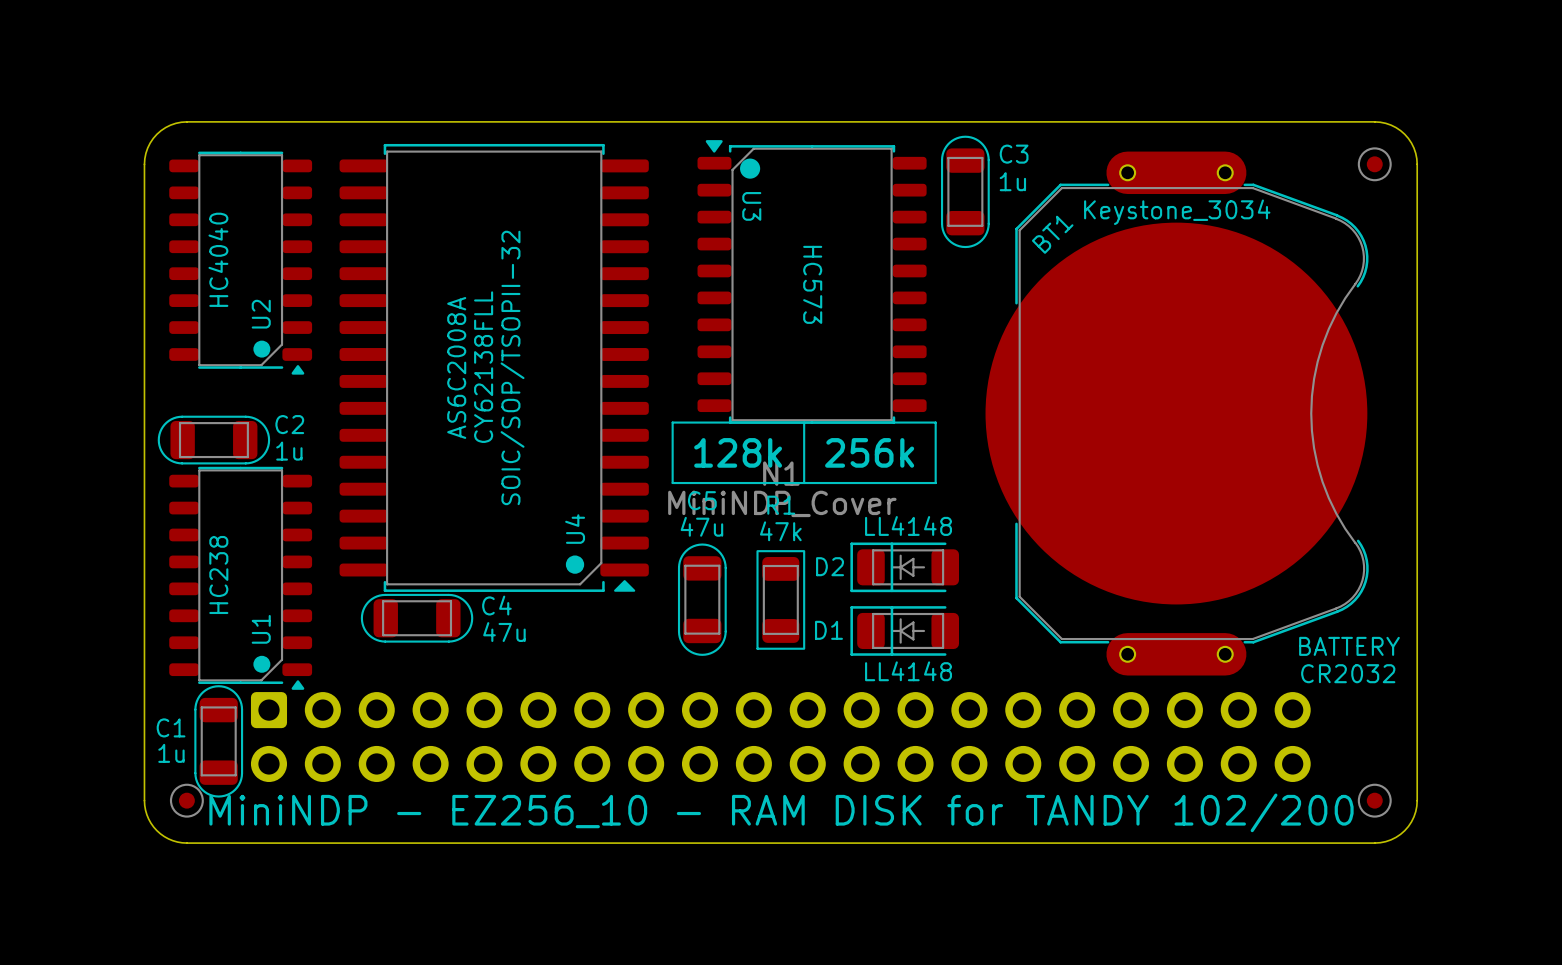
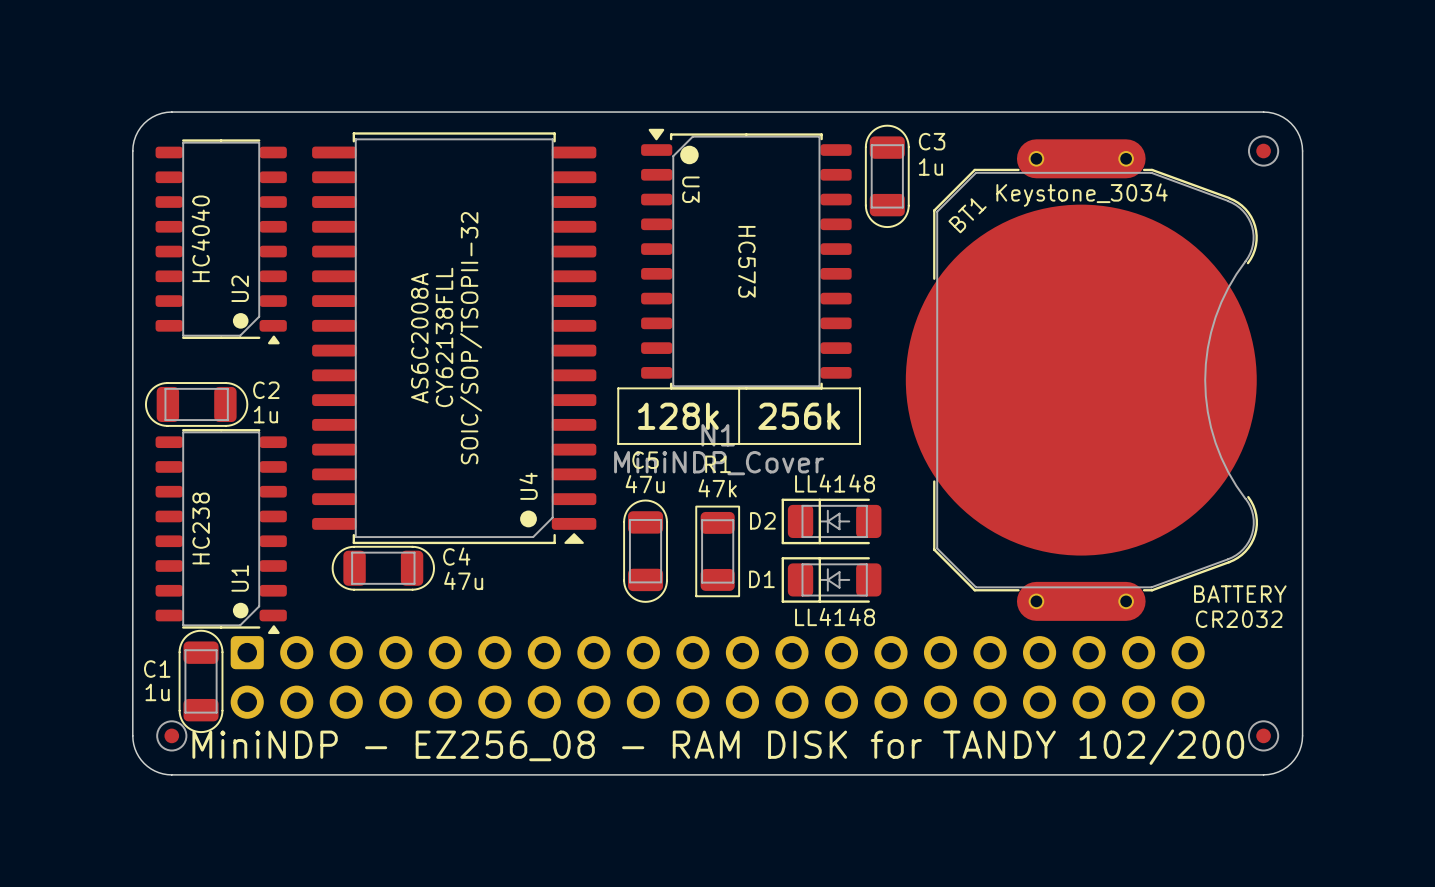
text: MiniNDP - EZ256_10 - RAM DISK for TANDY 102/200 (781, 812) -> MiniNDP - EZ256_08 - RAM DISK for TANDY 102/200 (718, 747)

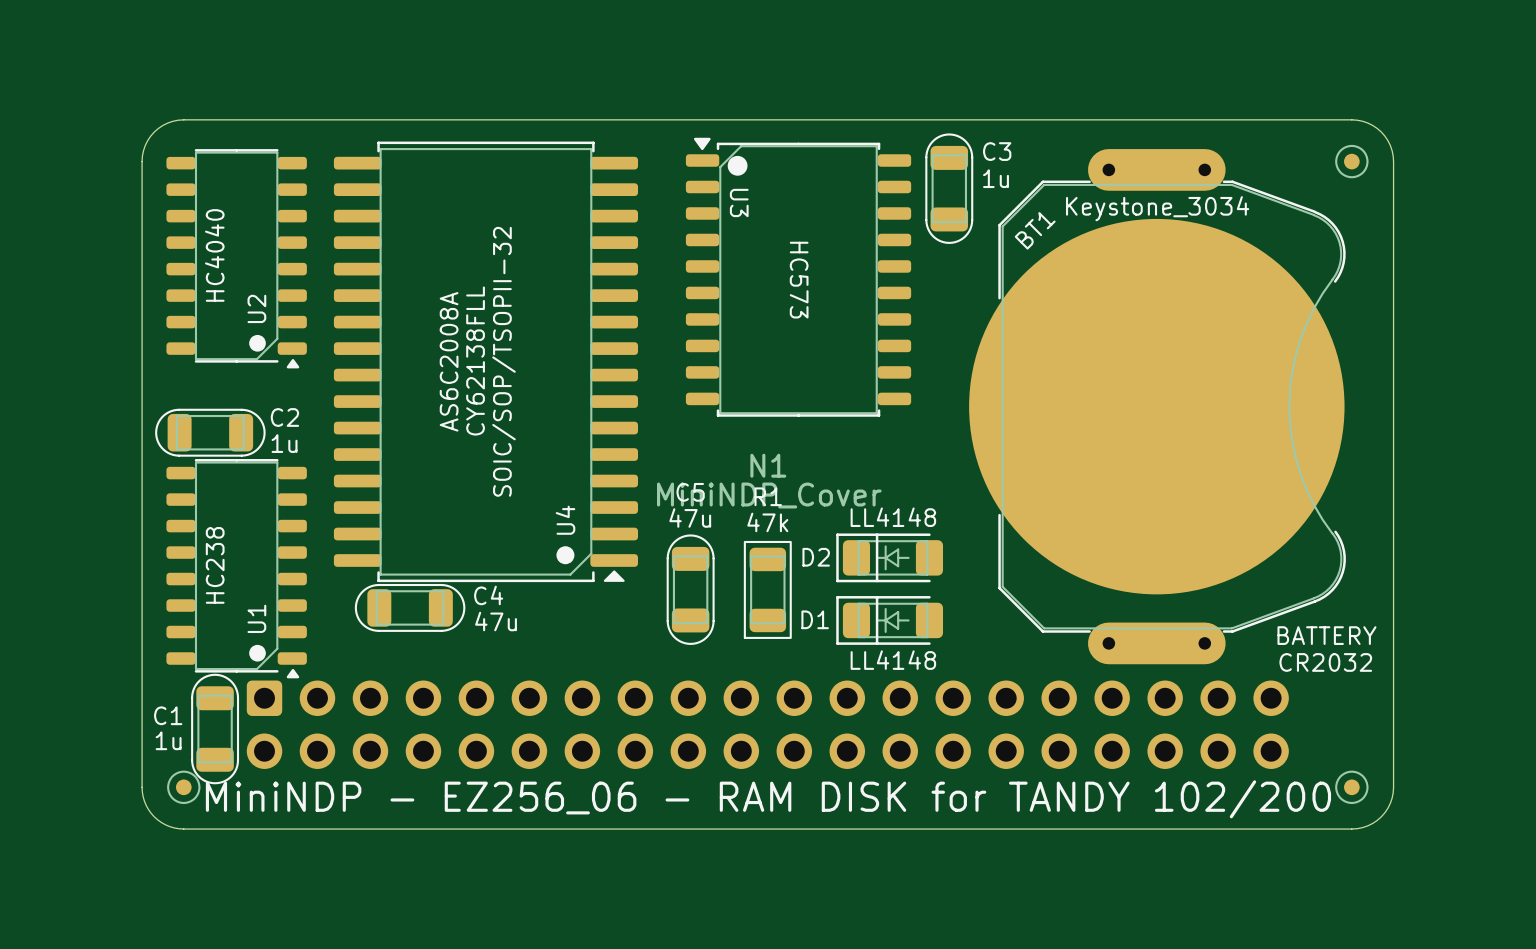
line: (618, 388) (860, 388) (860, 443) (618, 443) (618, 388) -> none
line: (739, 388) (739, 443) -> none
text: 128k 256k (739, 416) -> none
text: MiniNDP - EZ256_08 - RAM DISK for TANDY 102/200 (718, 747) -> MiniNDP - EZ256_06 - RAM DISK for TANDY 102/200 (768, 799)

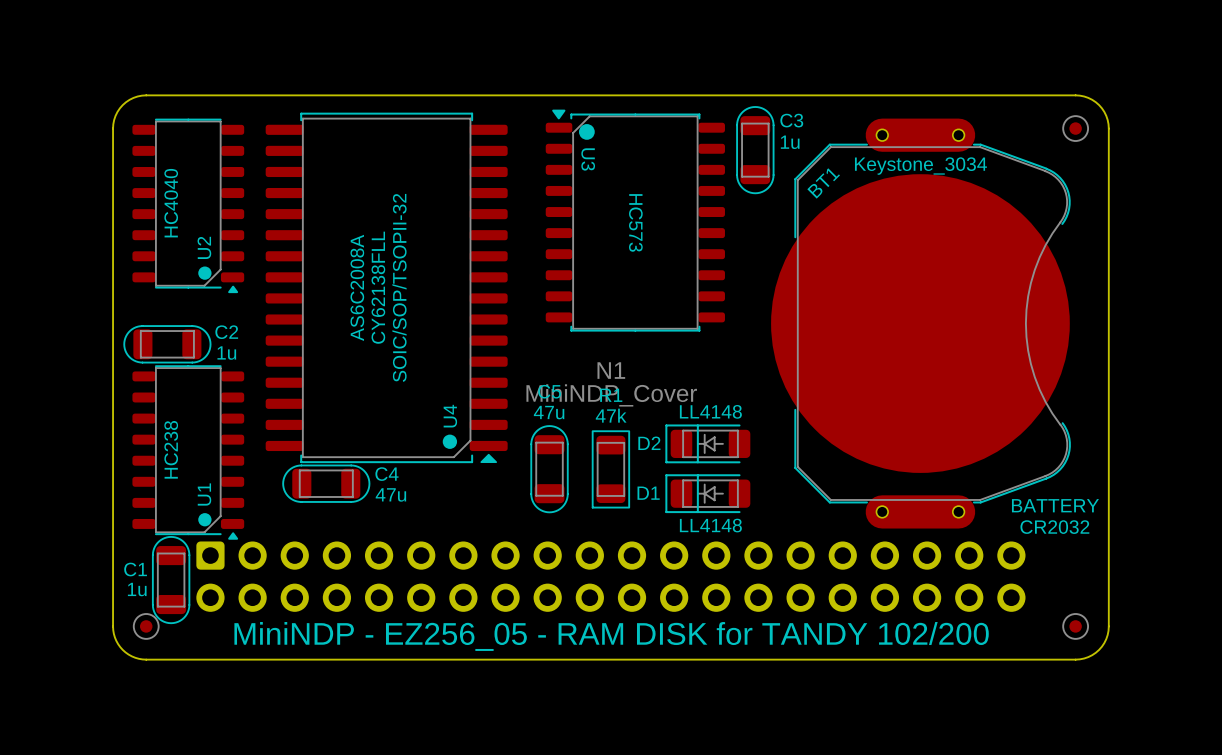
text: MiniNDP - EZ256_06 - RAM DISK for TANDY 102/200 (768, 799) -> MiniNDP - EZ256_05 - RAM DISK for TANDY 102/200 (611, 636)

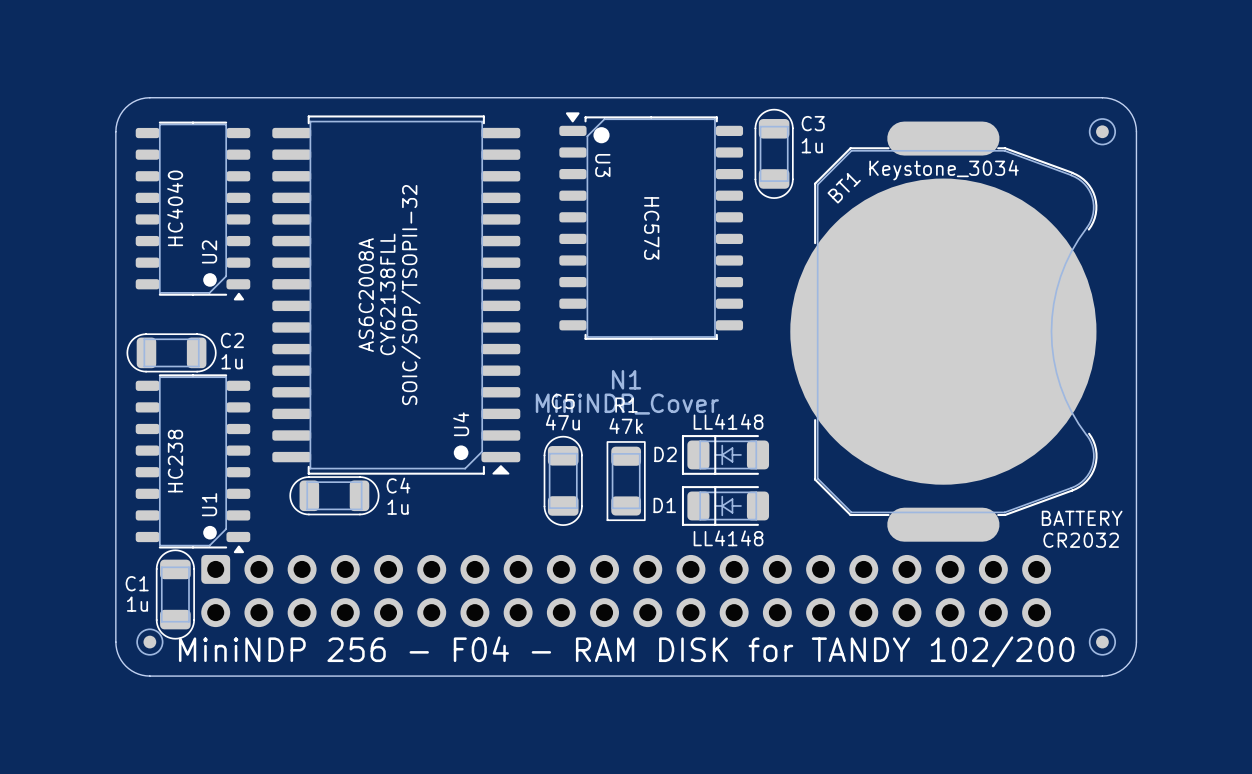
part: (882, 135) -> none
part: (958, 135) -> none
C4 value: 47u (390, 494) -> 1u (398, 507)
part: (882, 511) -> none
part: (958, 511) -> none
text: MiniNDP - EZ256_05 - RAM DISK for TANDY 102/200 (611, 636) -> MiniNDP 256 - F04 - RAM DISK for TANDY 102/200 (626, 651)

